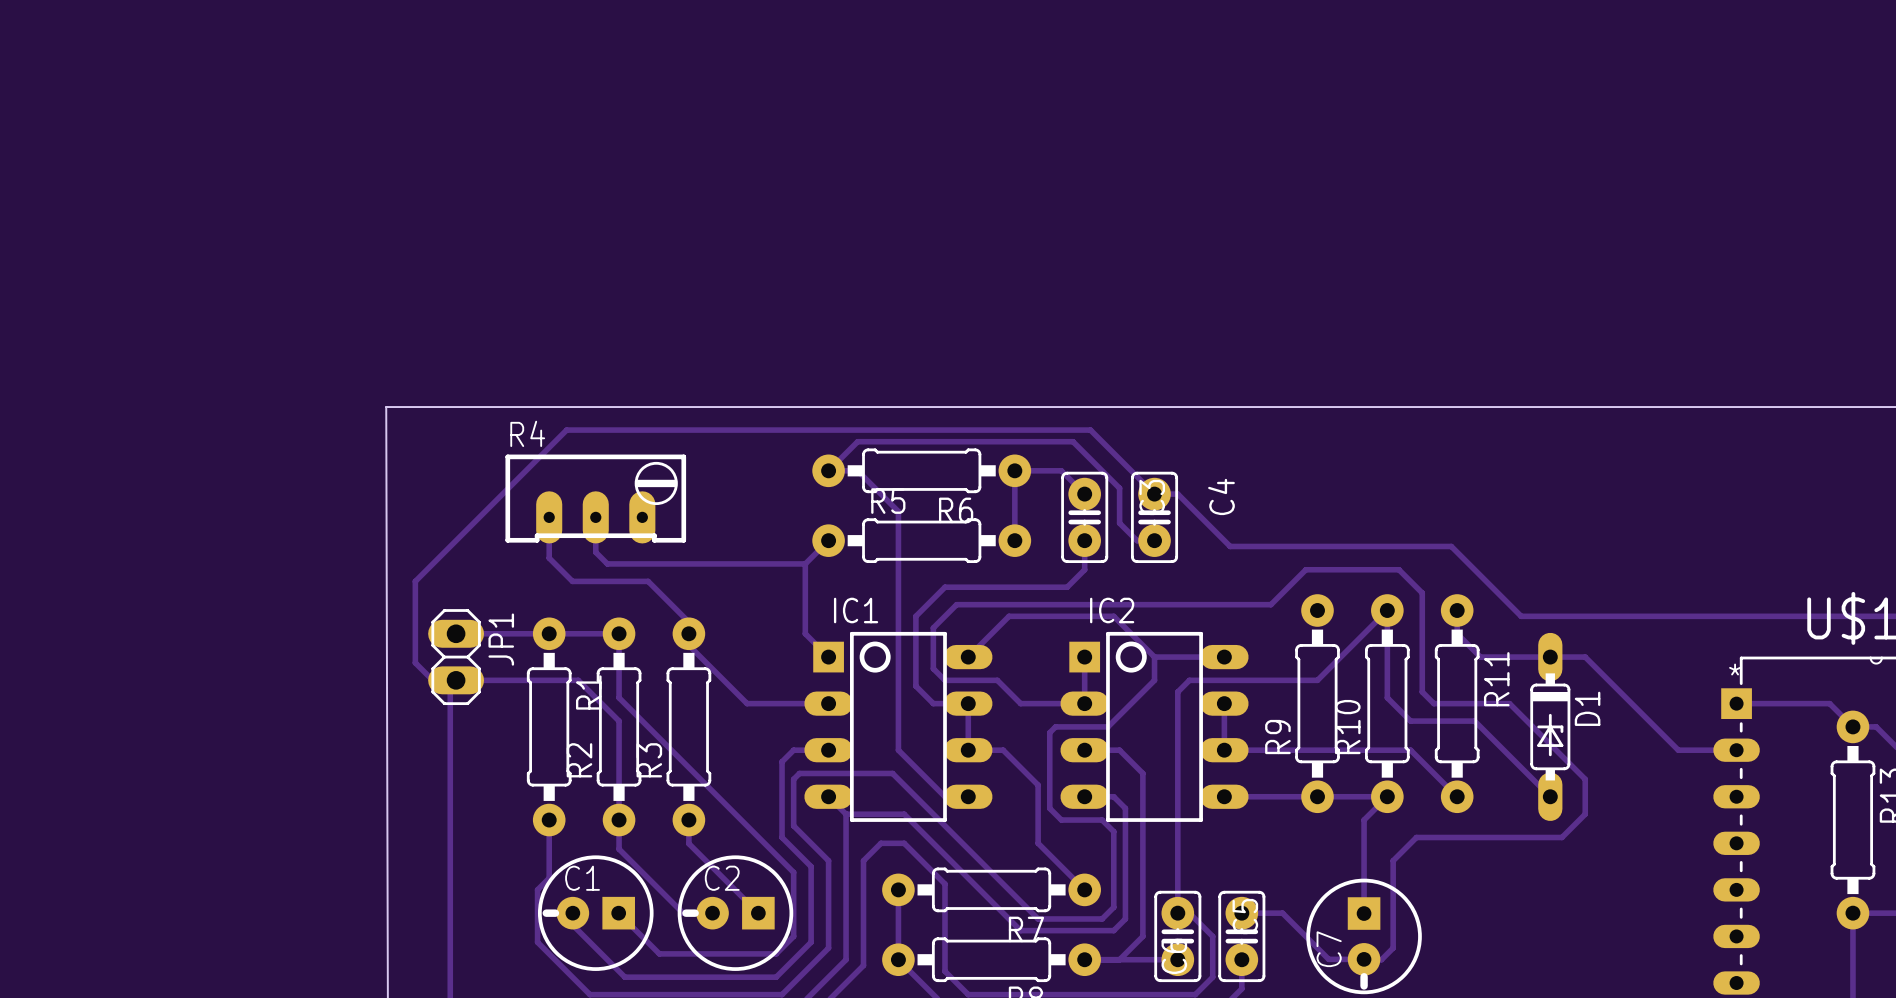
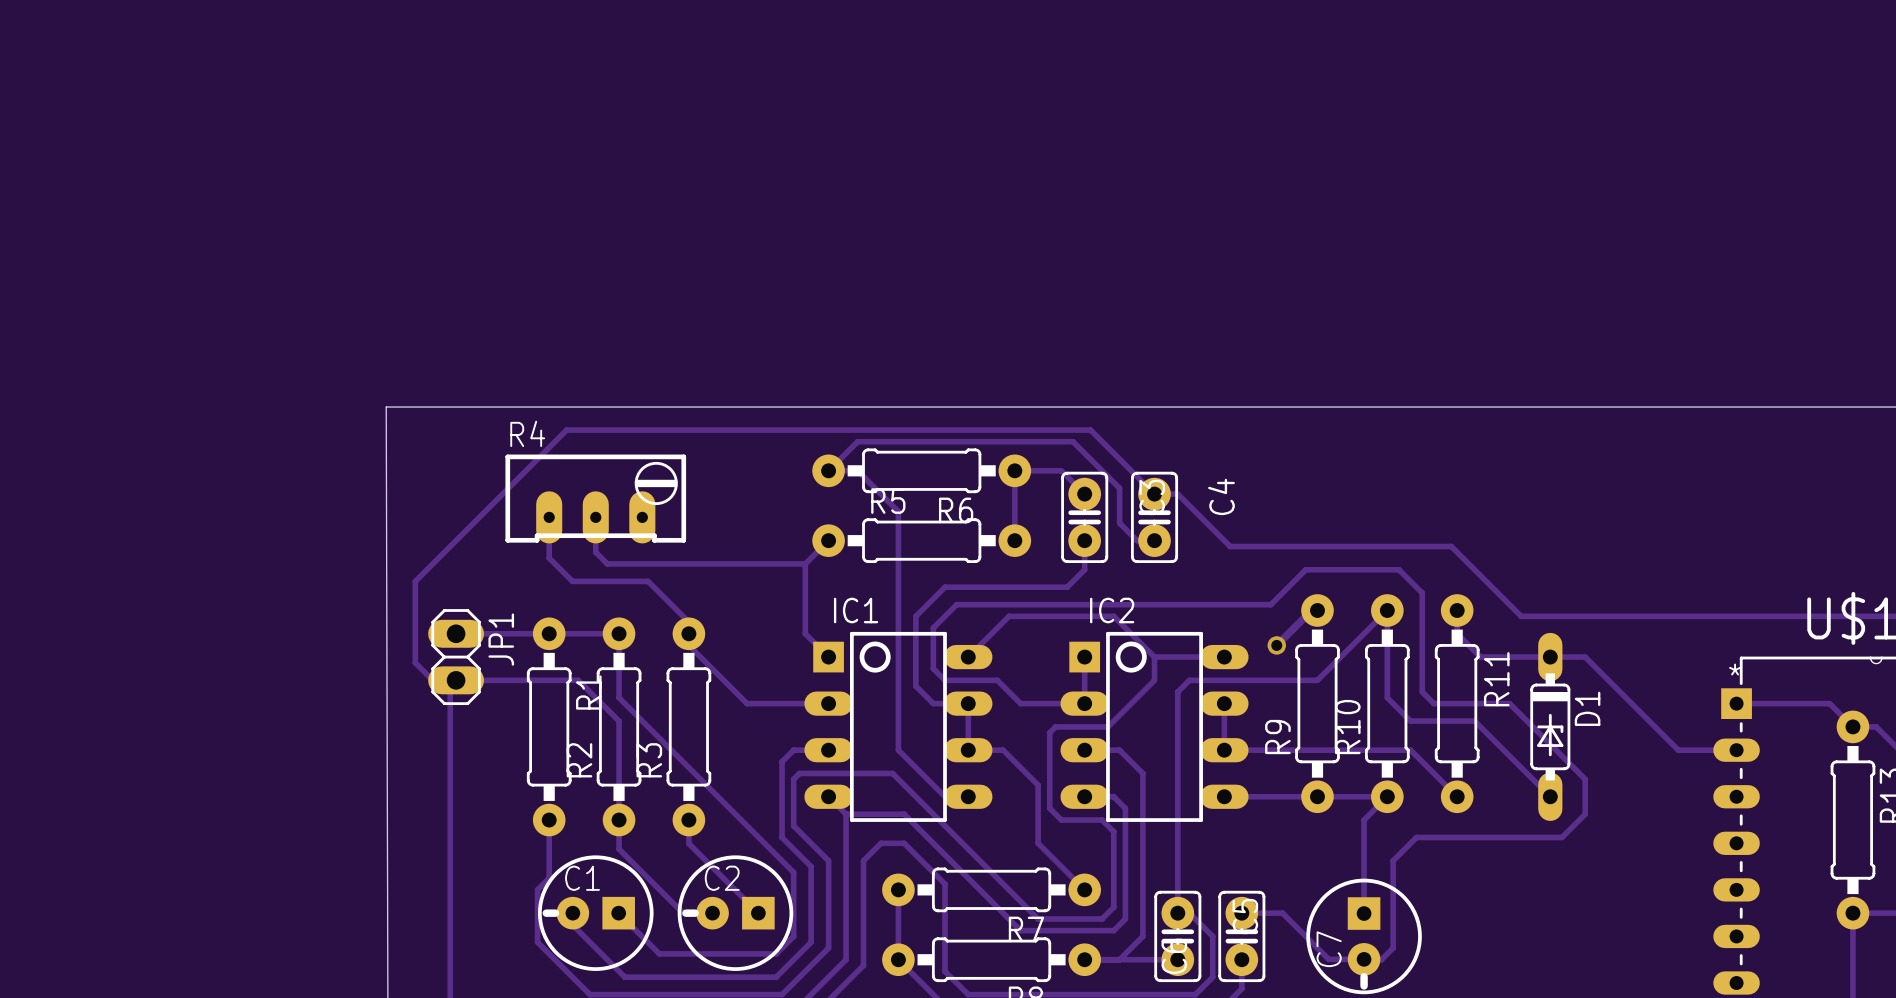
track: none -> (1317, 610) (1311, 610) (1276, 645)
via: none -> (1276, 645)

